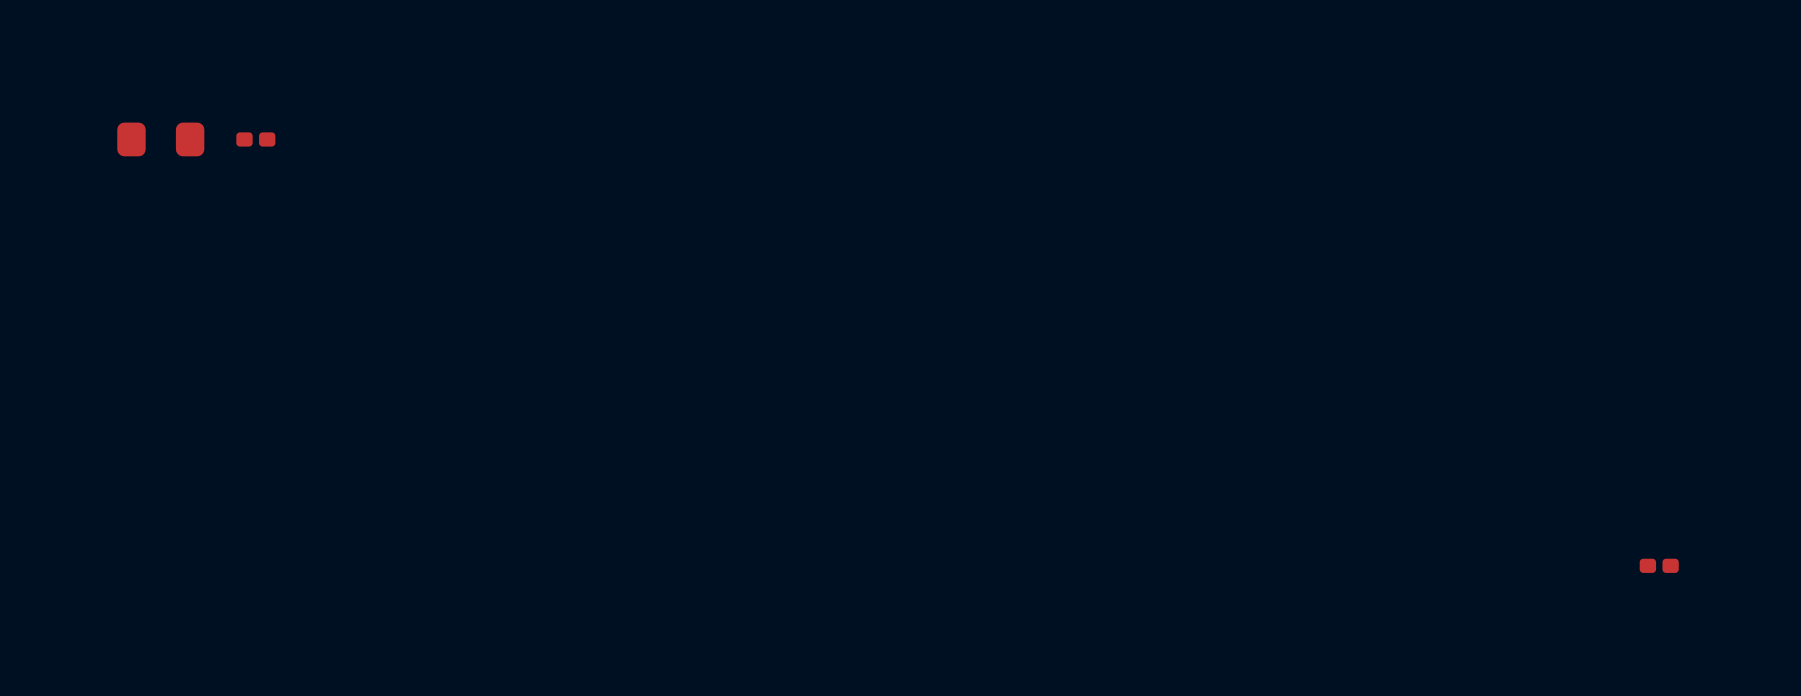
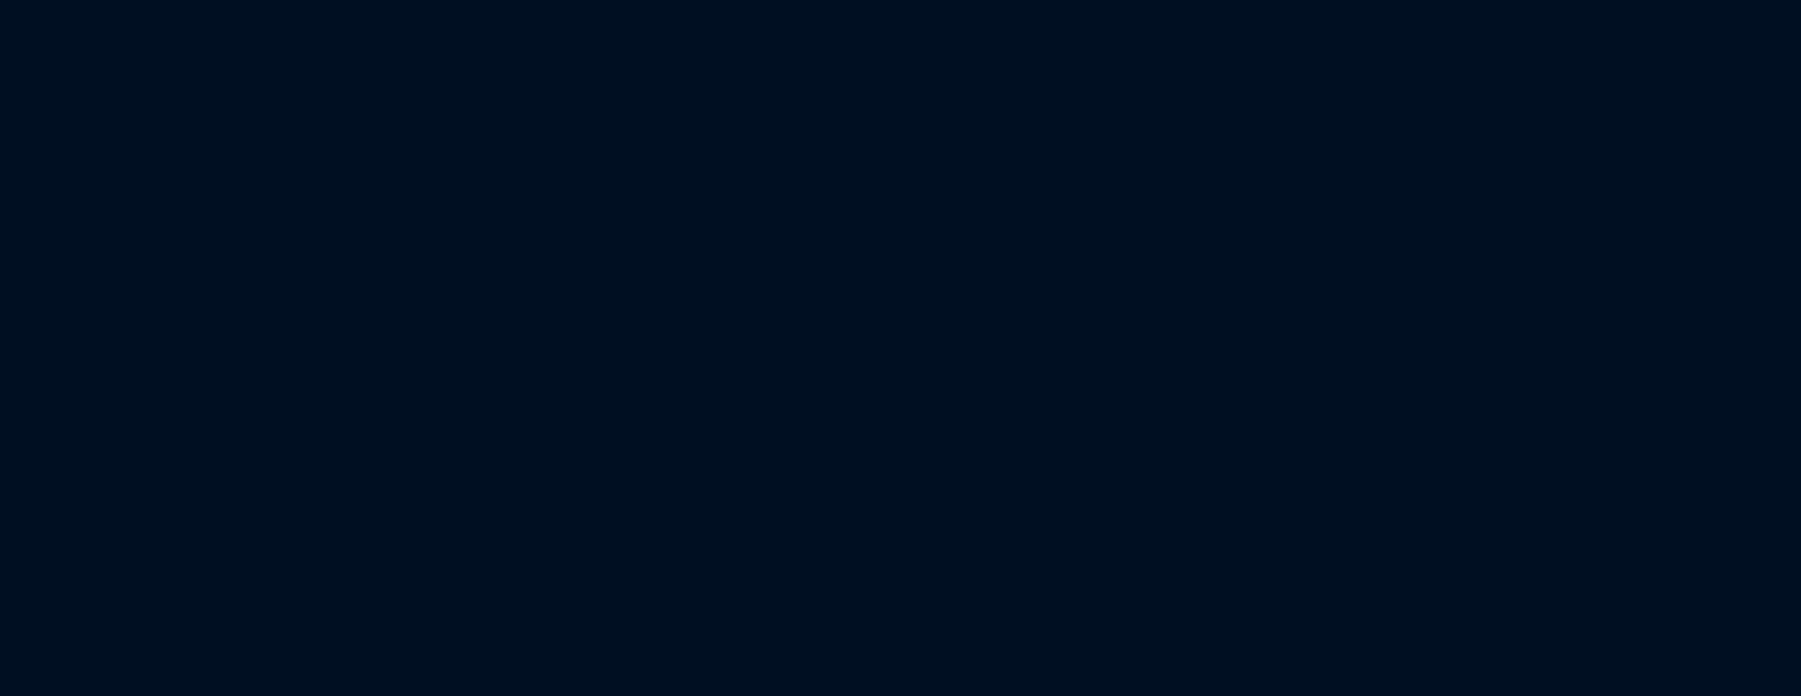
part: (160, 139) -> none
part: (255, 139) -> none
part: (1659, 565) -> none

